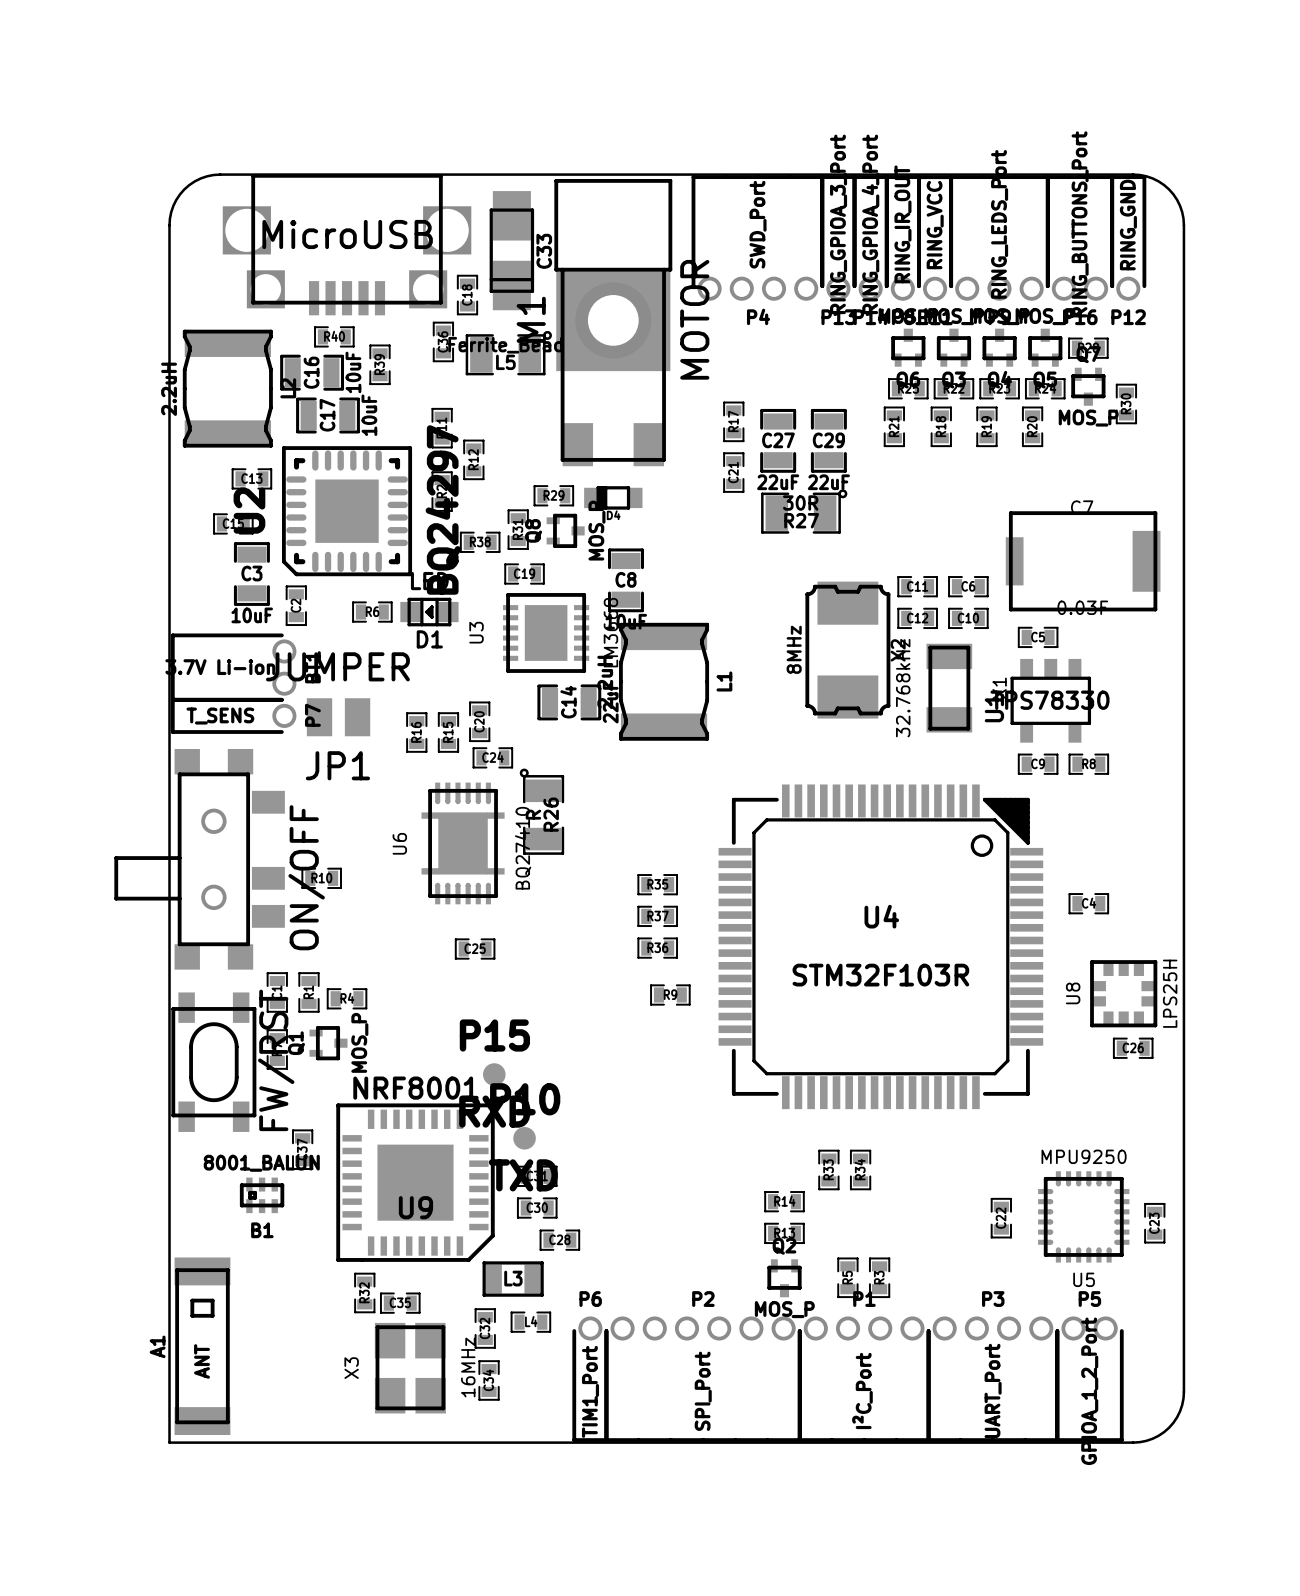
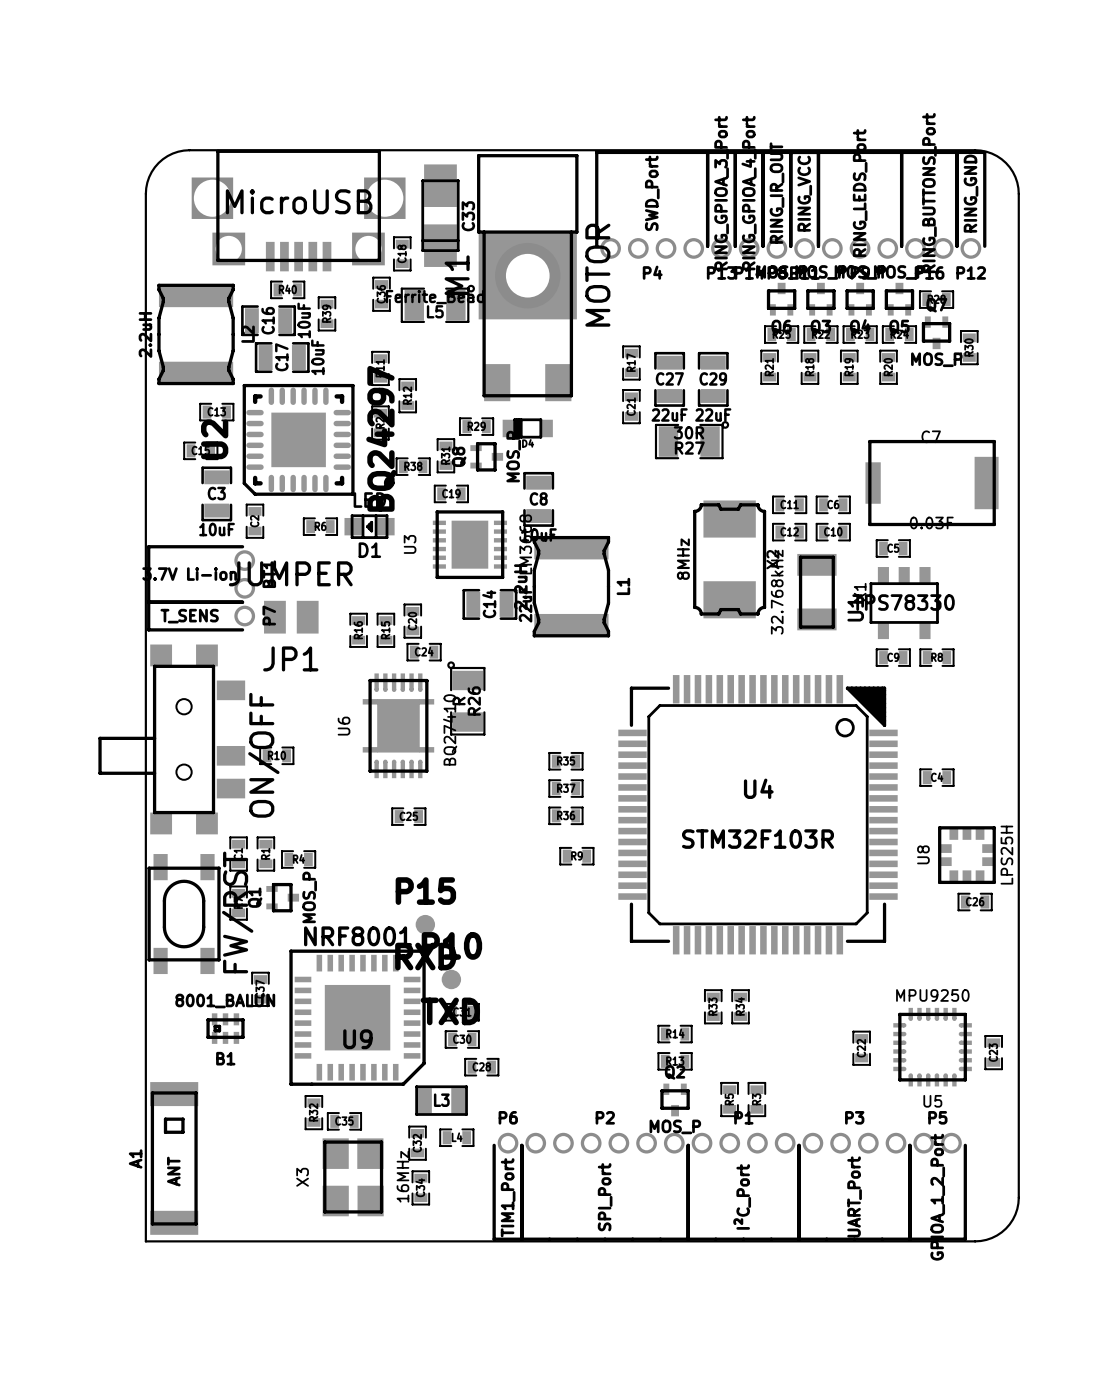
part footprint: [114, 748, 285, 970] -> [98, 644, 246, 835]

